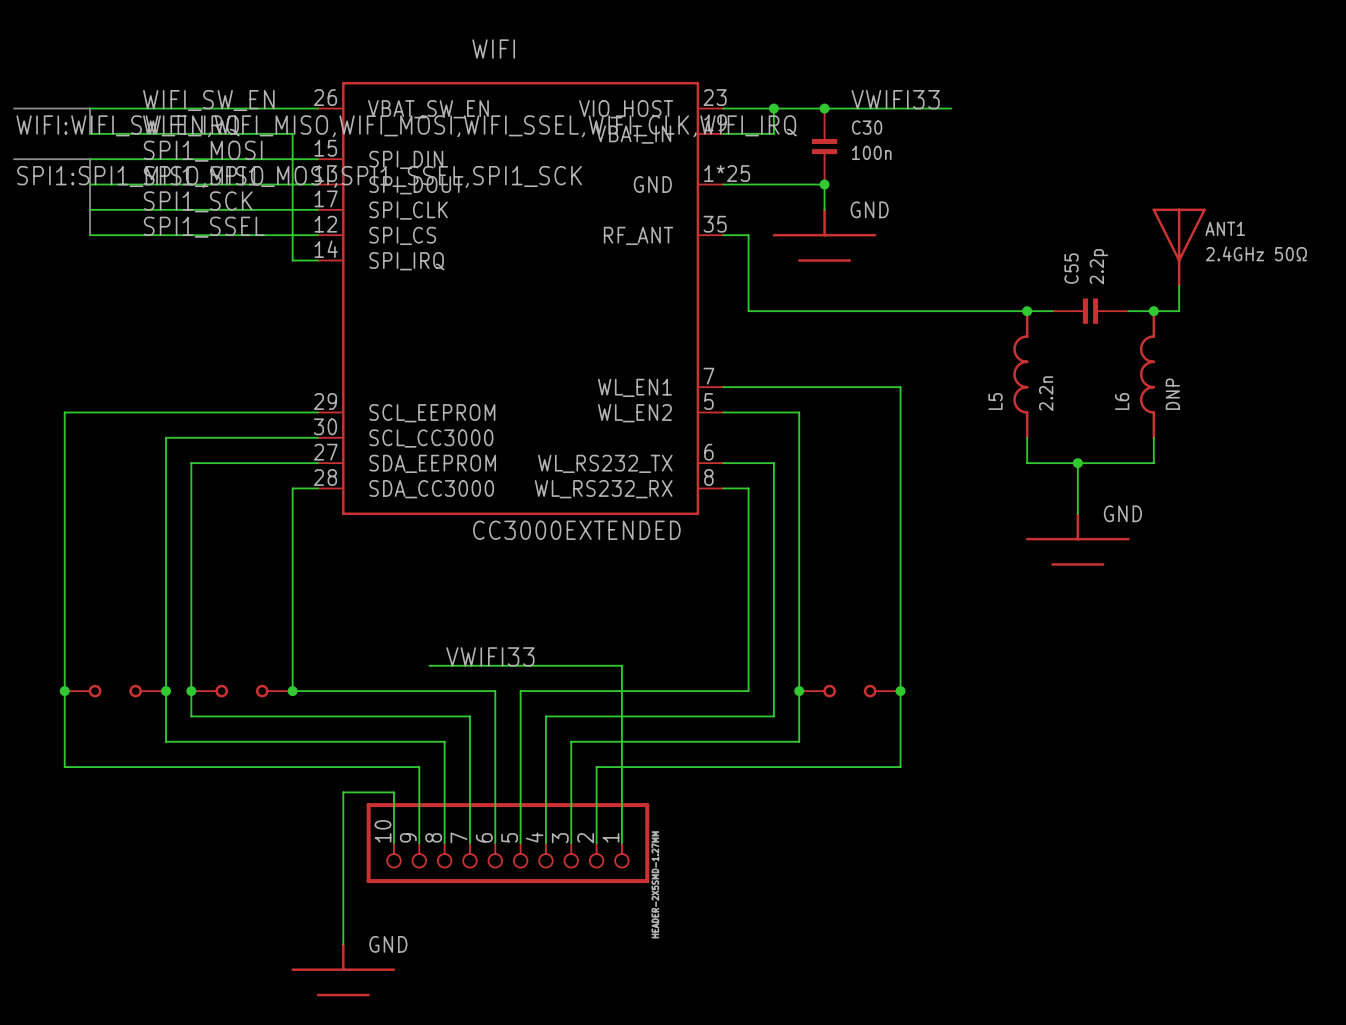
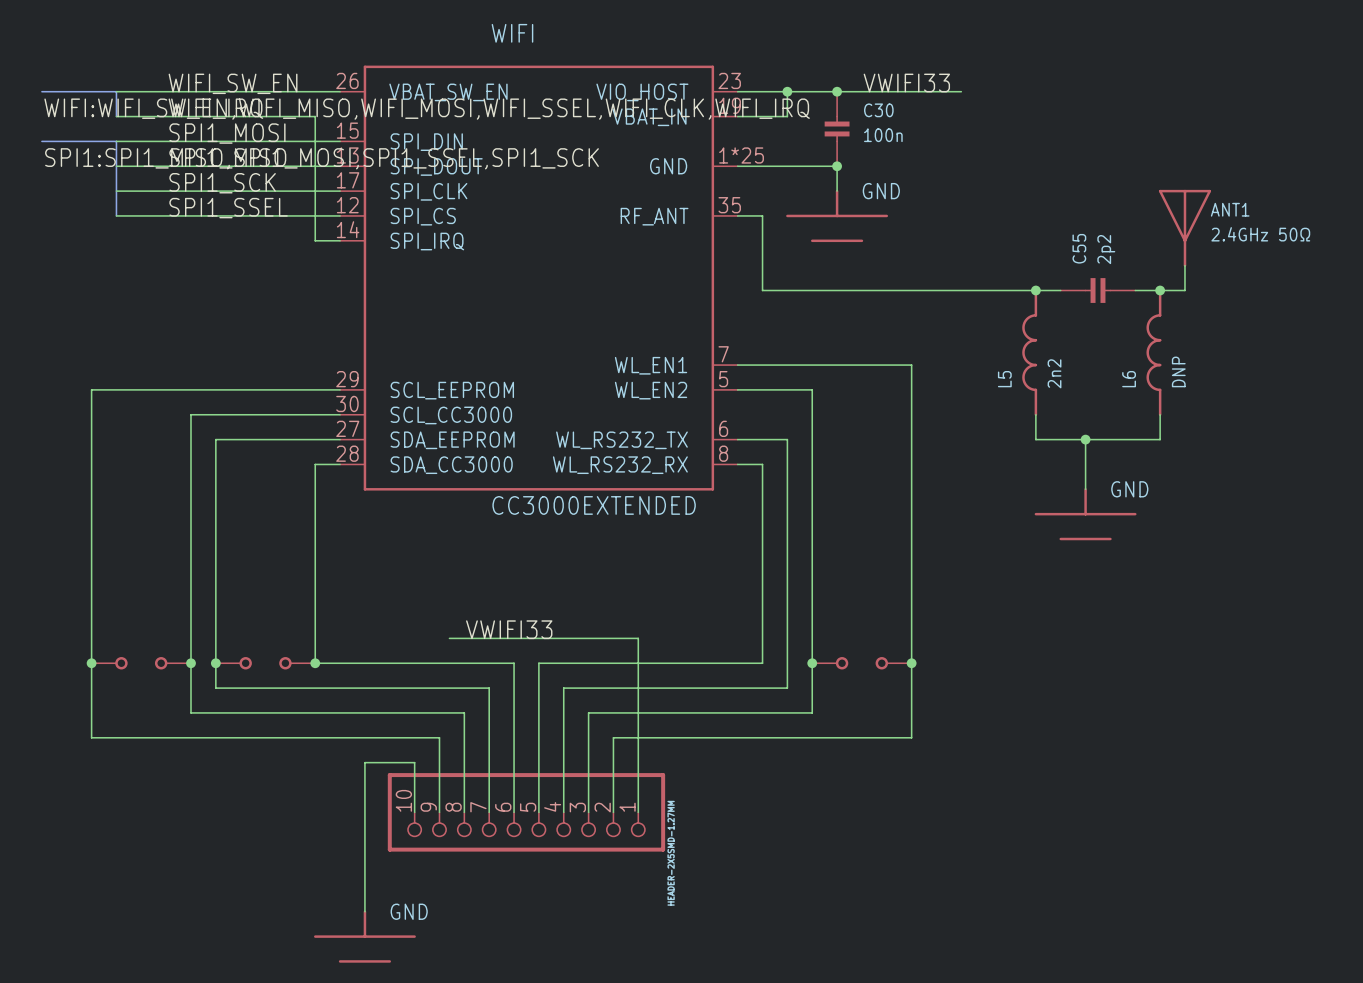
C55 value: 2.2p (1098, 266) -> 2p2 (1106, 249)
L5 value: 2.2n (1046, 393) -> 2n2 (1054, 373)

